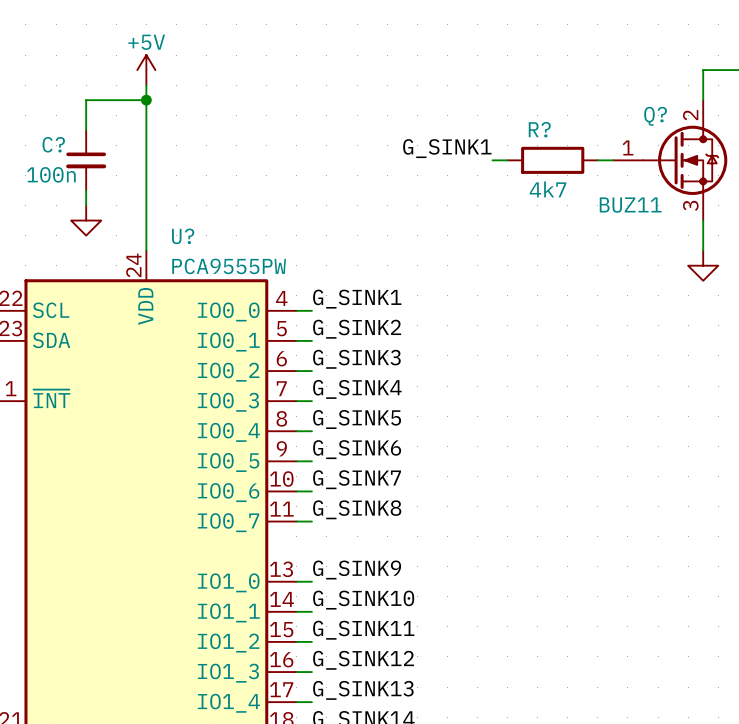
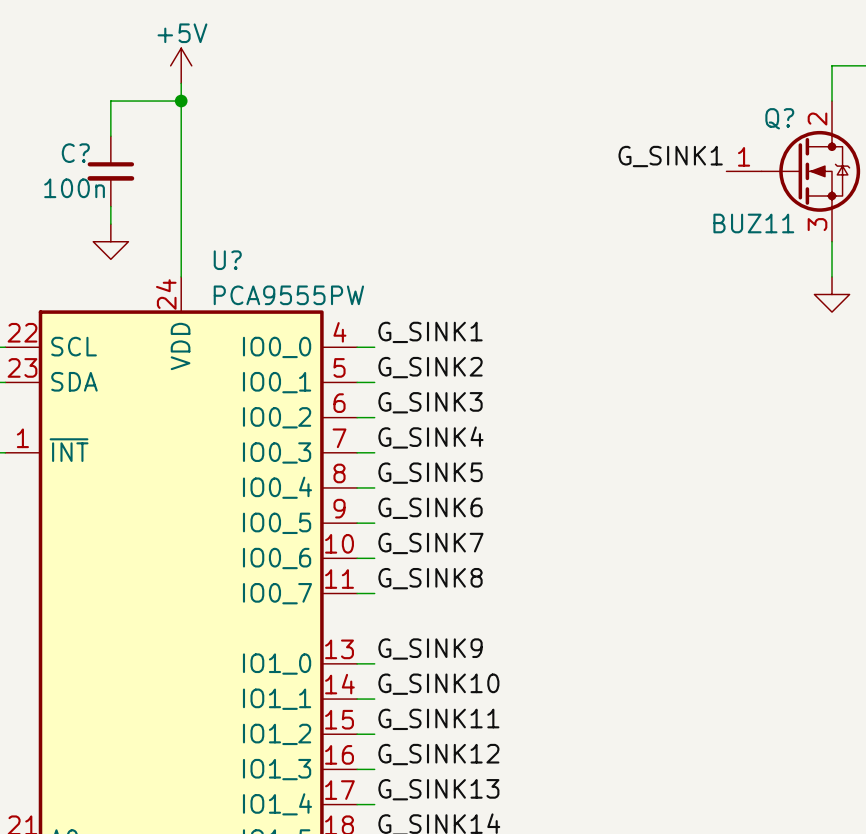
label position: G_SINK1 (447, 148) -> G_SINK1 (670, 156)
wire: (492, 160) (507, 160) -> none
R?: 4k7 (552, 160) -> none
wire: (597, 160) (612, 160) -> none

